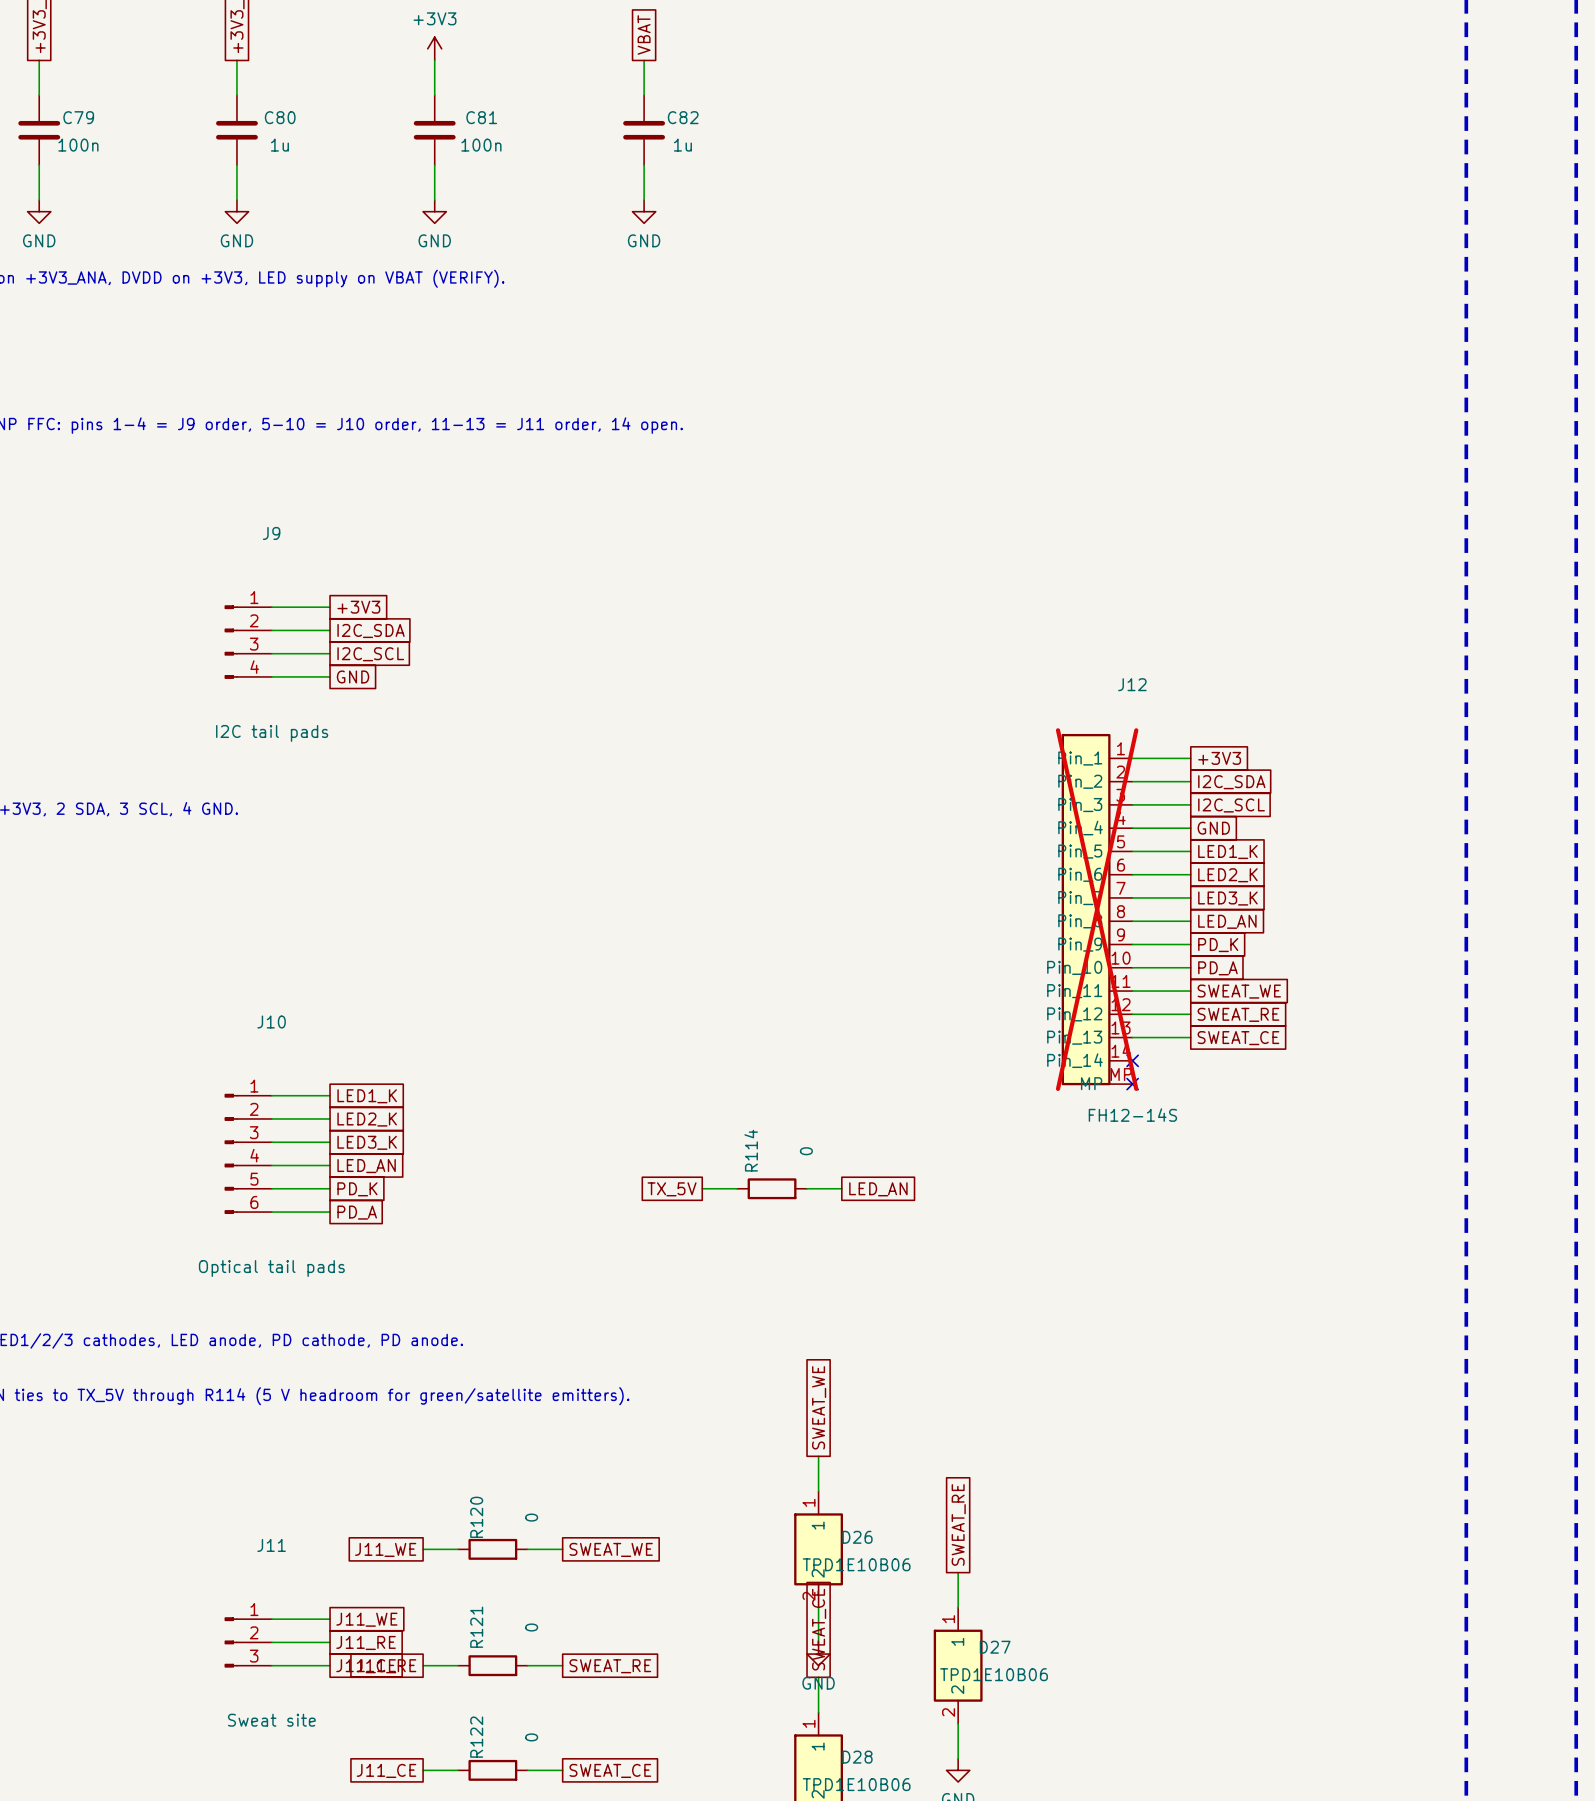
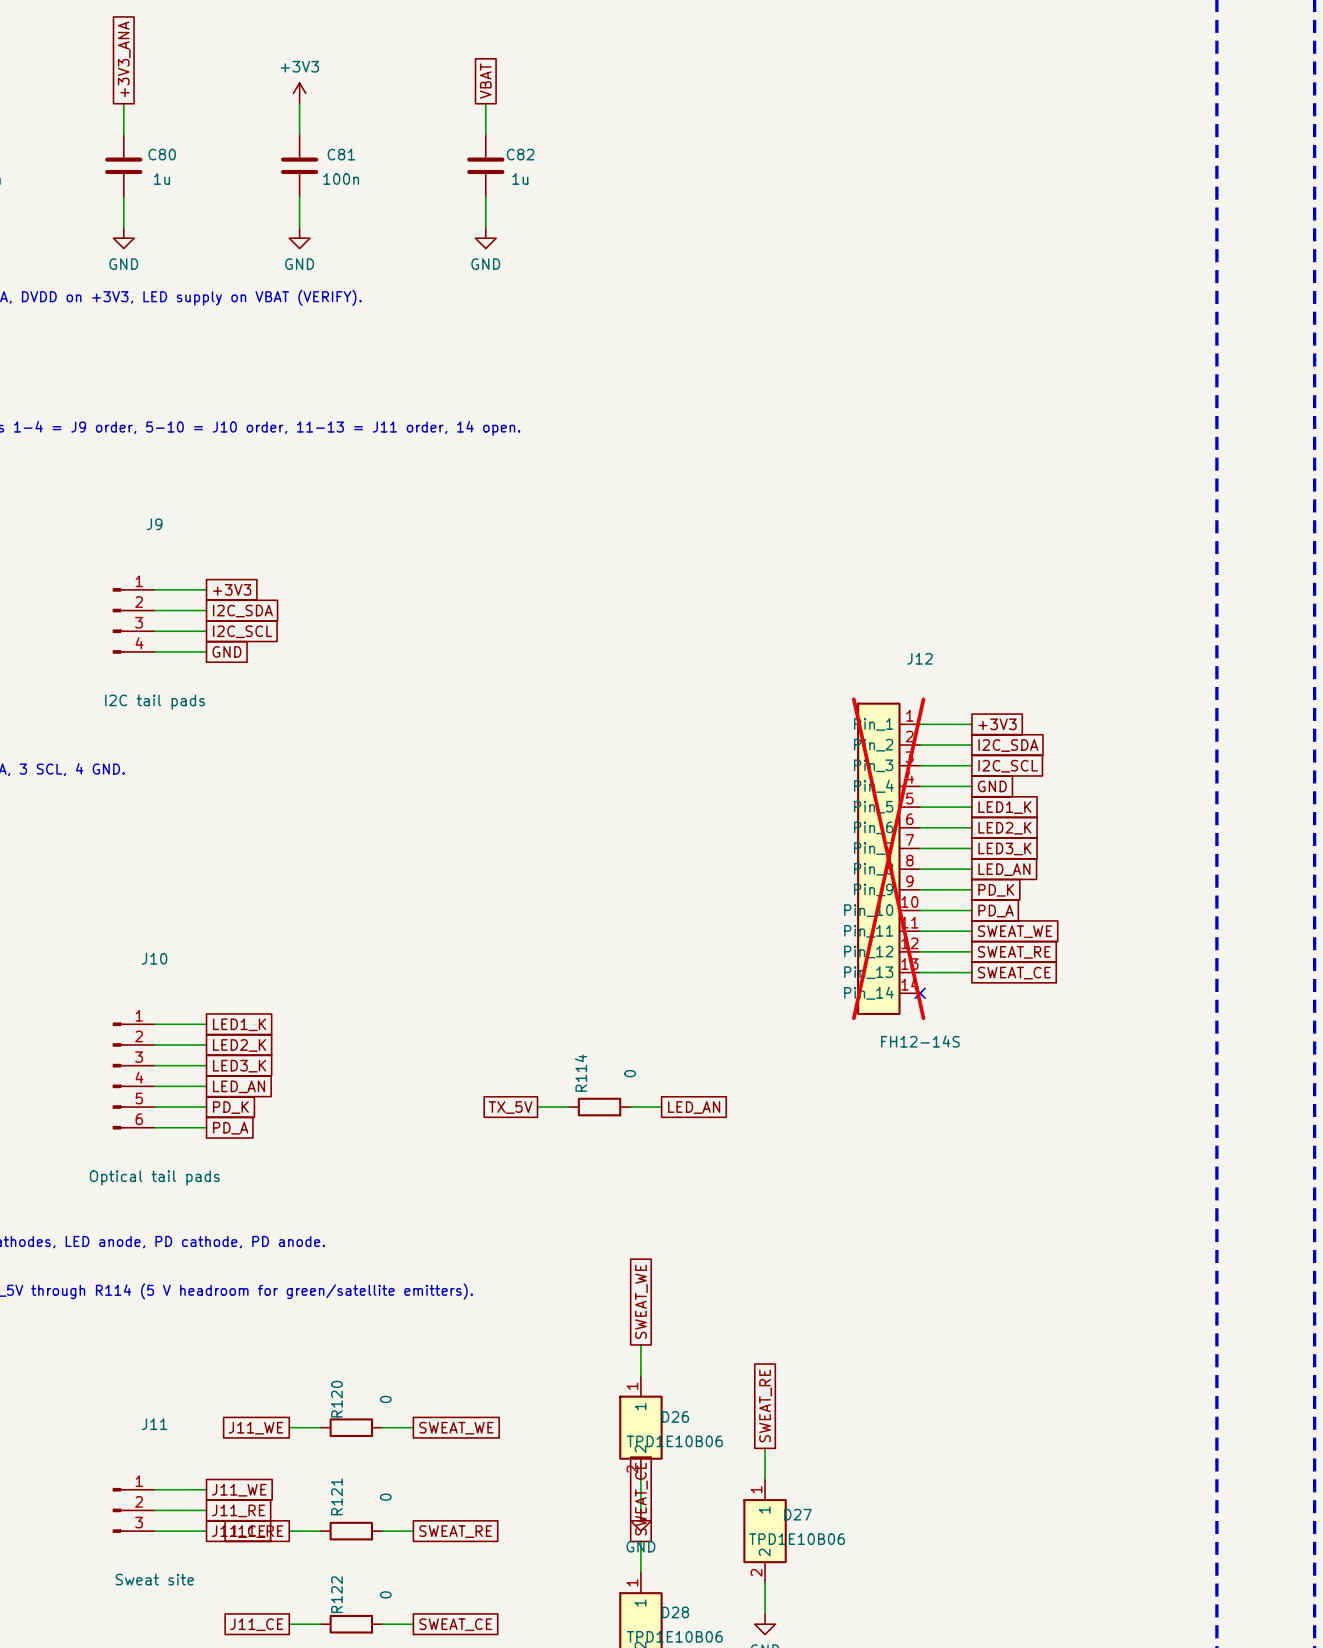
J12 symbol: [1061, 733, 1133, 1086] -> [857, 702, 921, 1015]
no-connect mark: (1132, 1084) -> none

